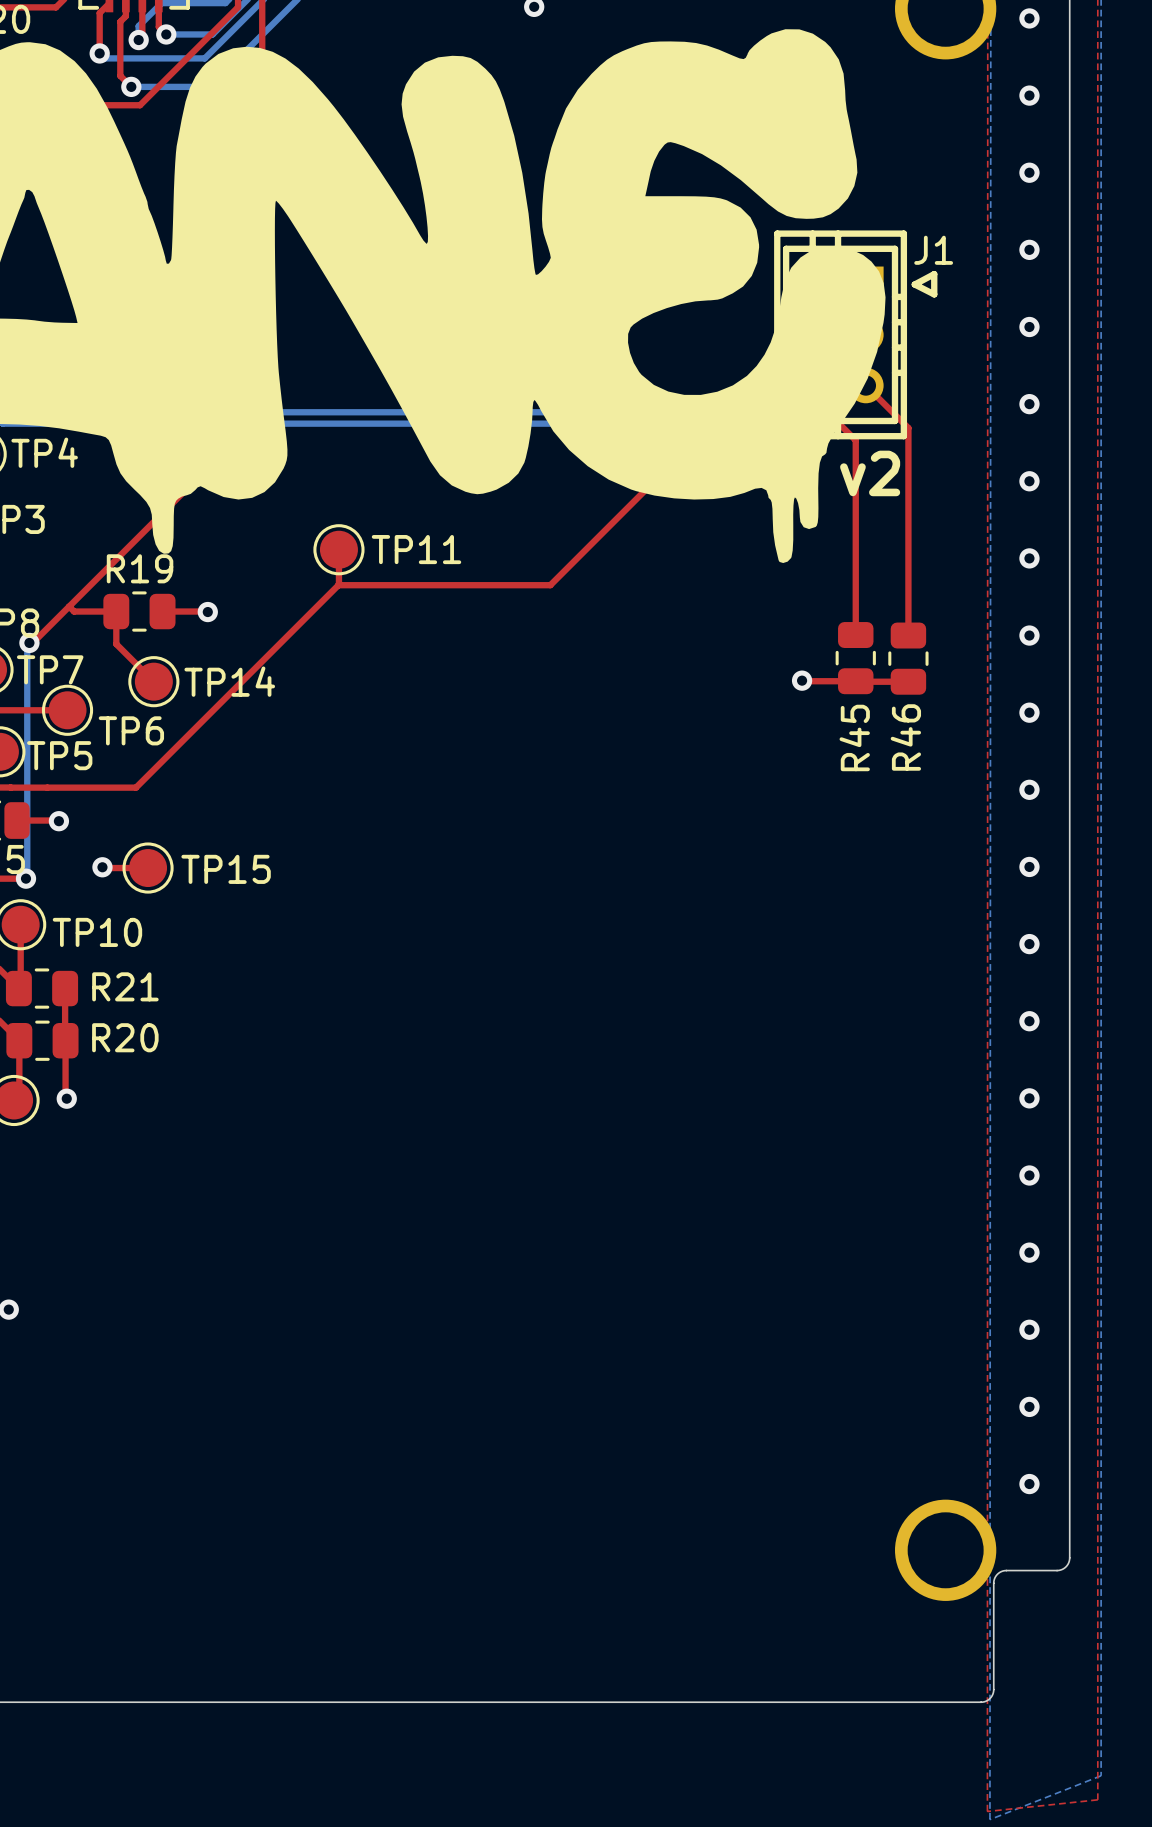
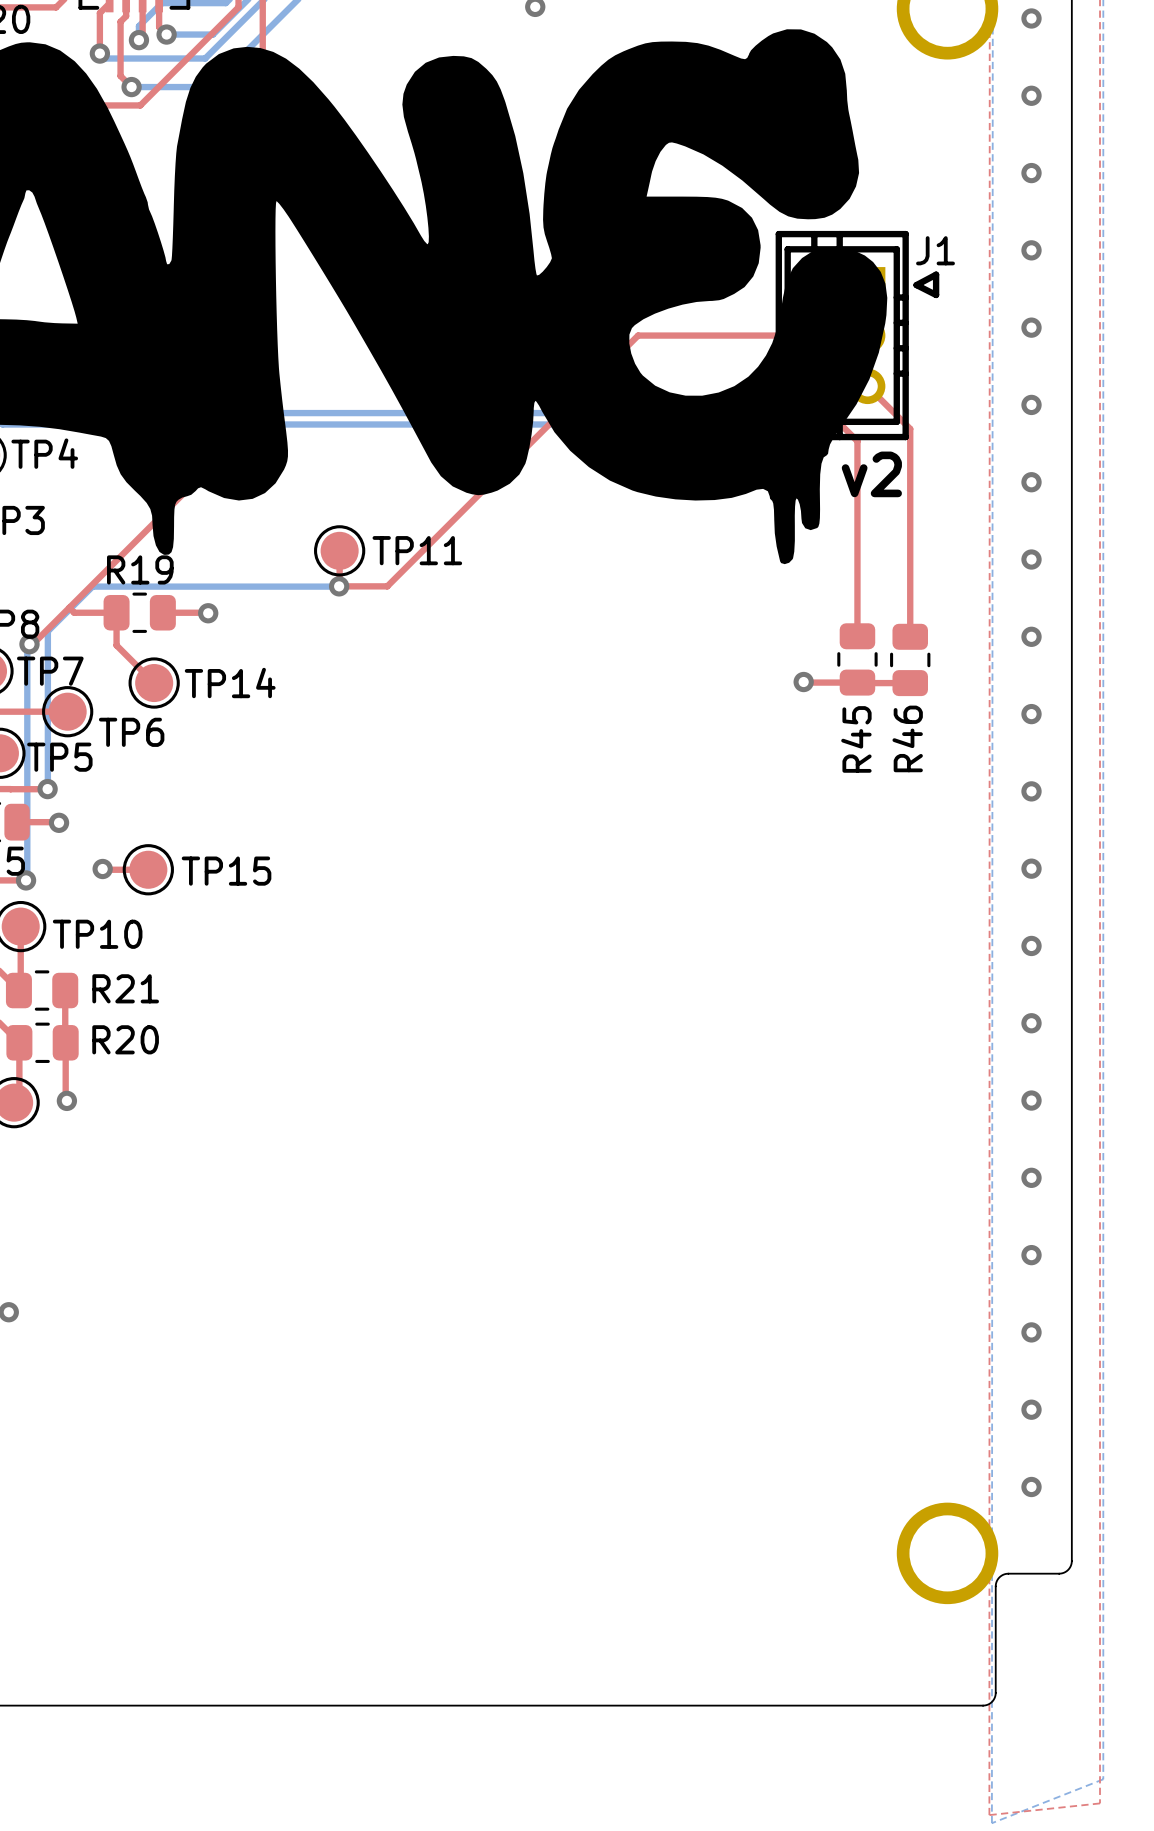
top track: (800, 334) (550, 585) (386, 585) -> (802, 335) (638, 335) (387, 586)
top track: (338, 585) (136, 787) (47, 787) -> none
bottom track: none -> (338, 586) (92, 586) (47, 631) (47, 788)
via: none -> (339, 586)
via: none -> (47, 789)

